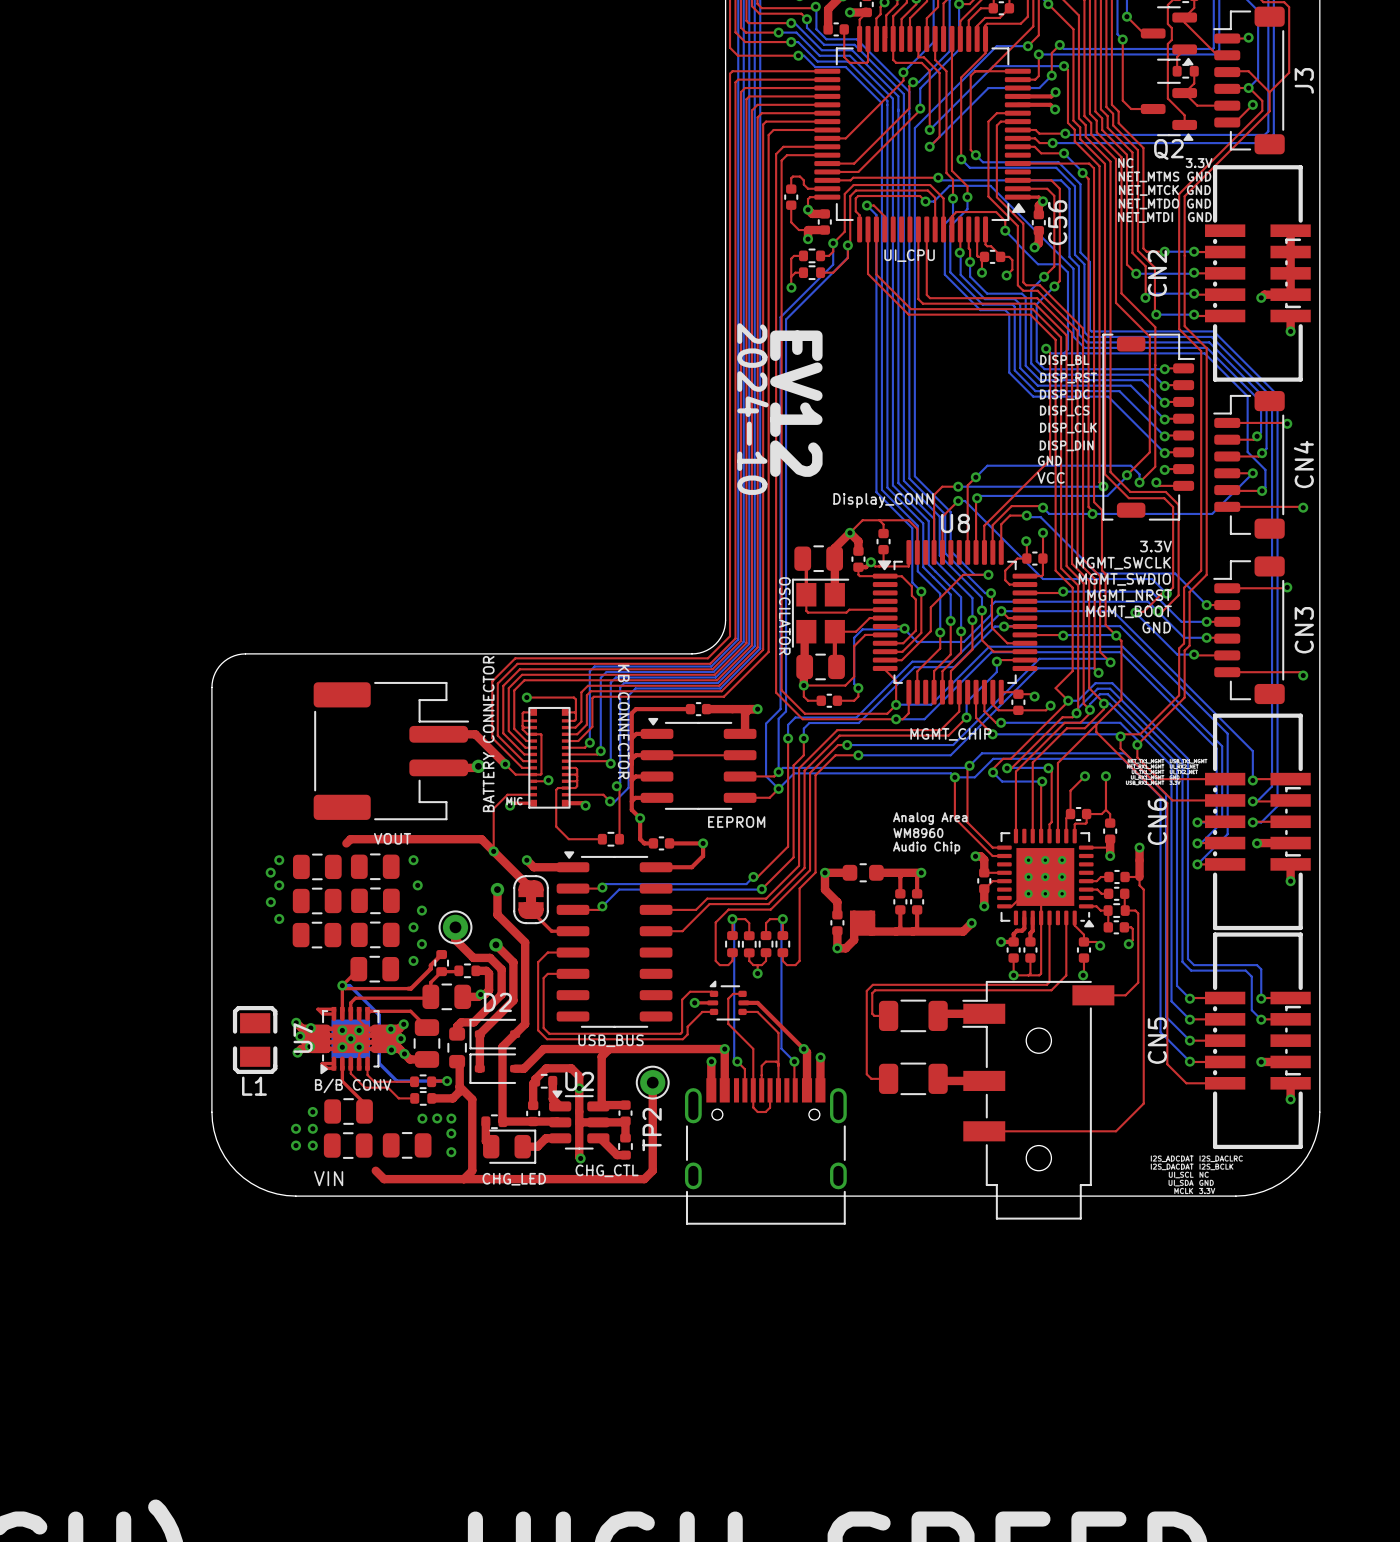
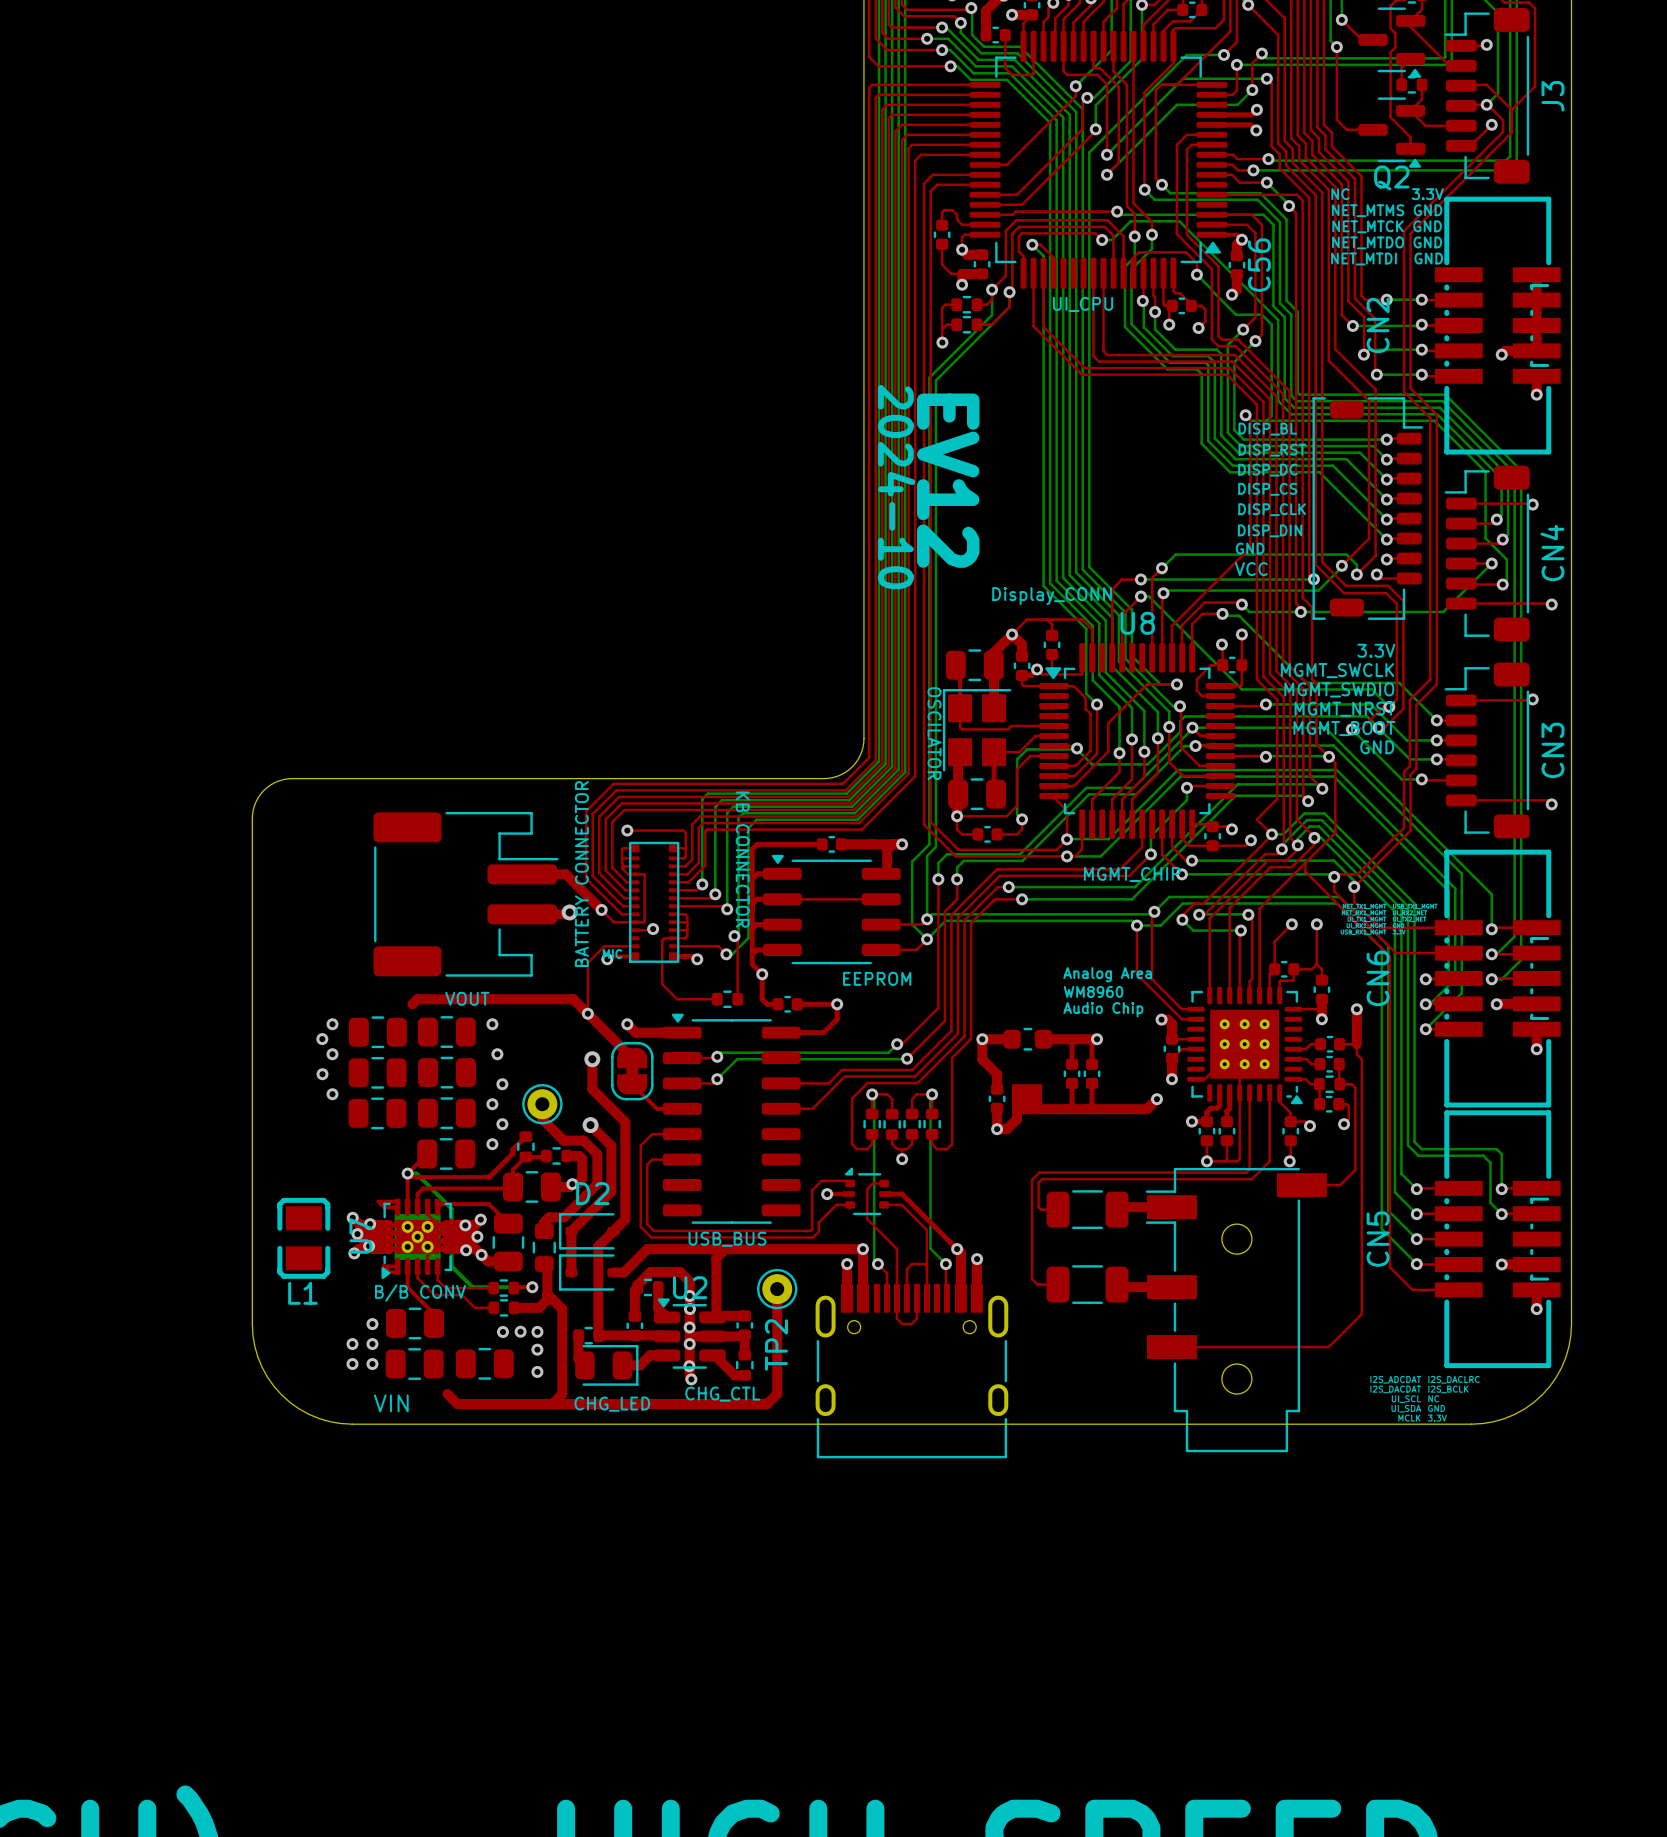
via: none -> (689, 1309)
via: none -> (689, 1327)
via: none -> (689, 1344)
via: none -> (689, 1366)

